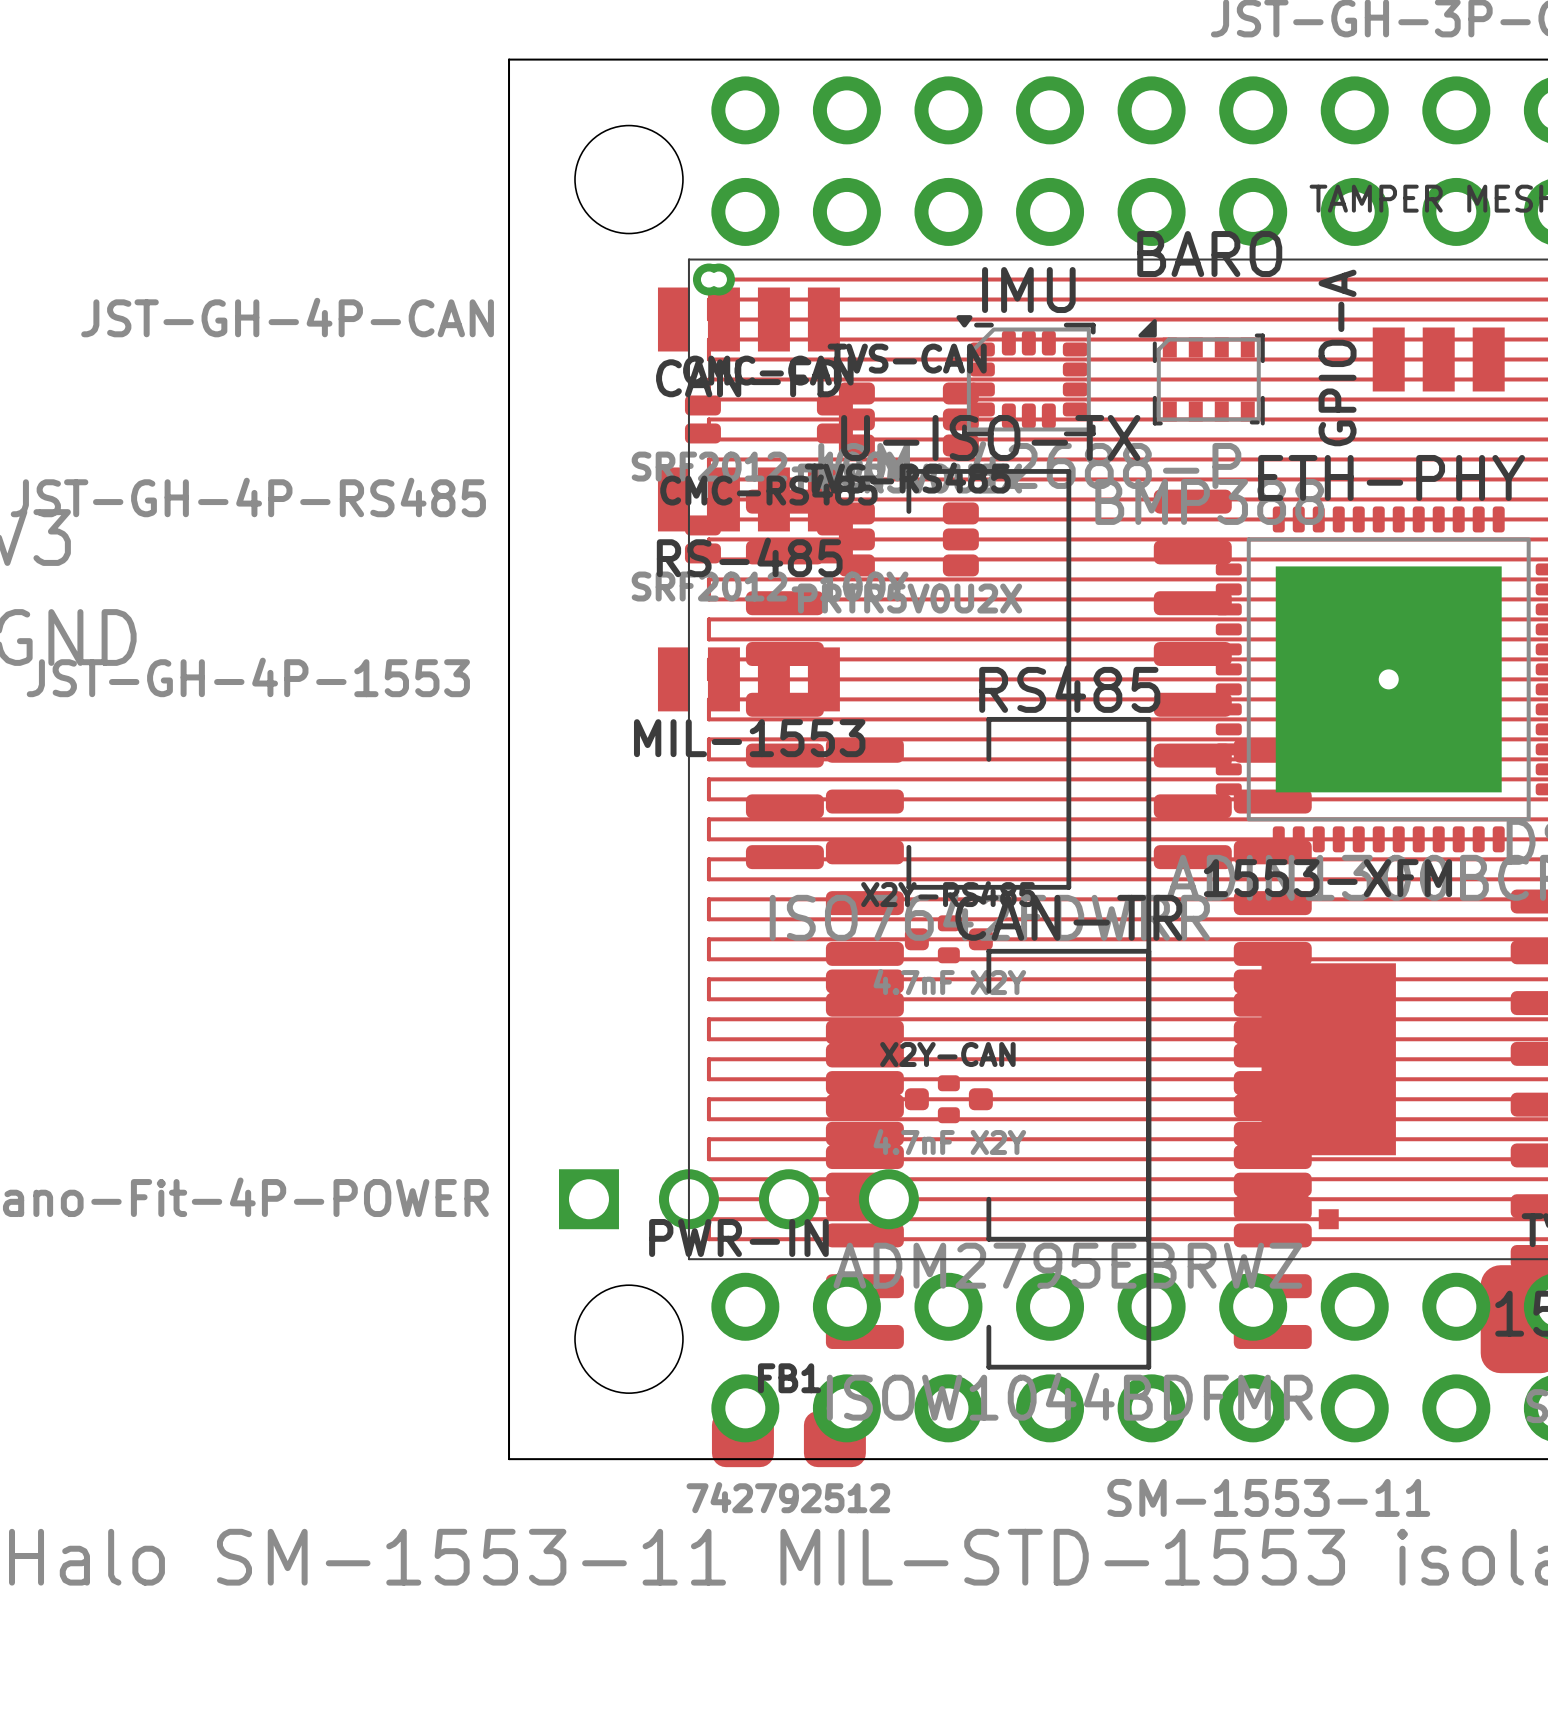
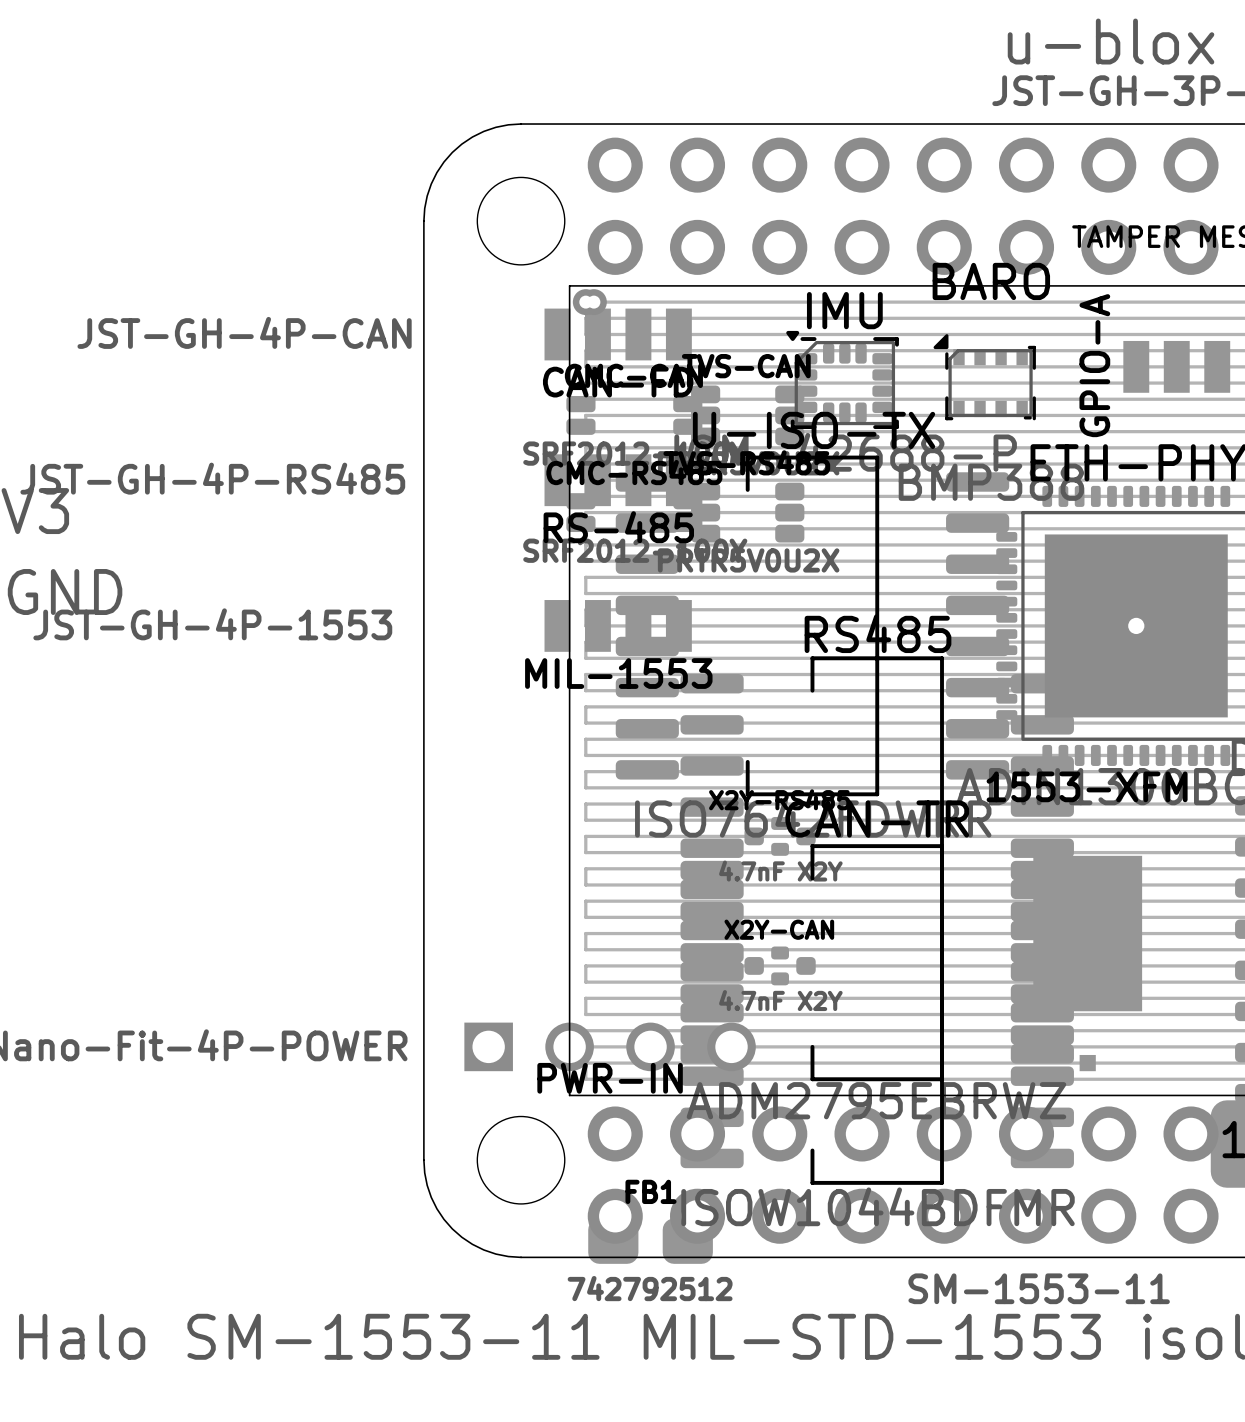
board edge: (628, 59) (509, 59) (509, 179) -> (521, 124) (495, 127) (483, 131) (461, 144) (452, 152) (436, 172) (431, 183) (424, 208) (423, 221)
board edge: (509, 1339) (509, 1459) (628, 1459) -> (423, 1160) (424, 1172) (431, 1197) (443, 1219) (452, 1228) (461, 1237) (483, 1249) (508, 1256) (521, 1257)

